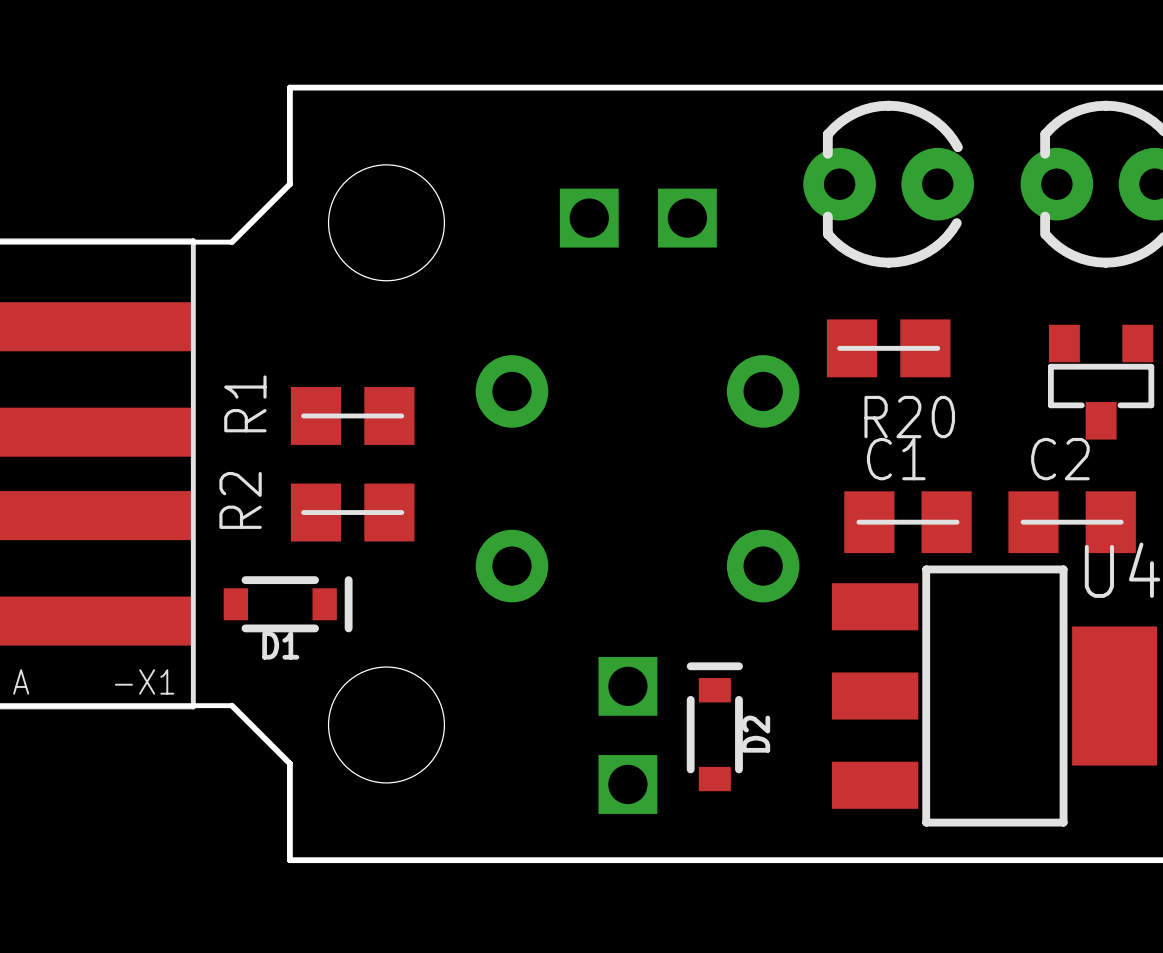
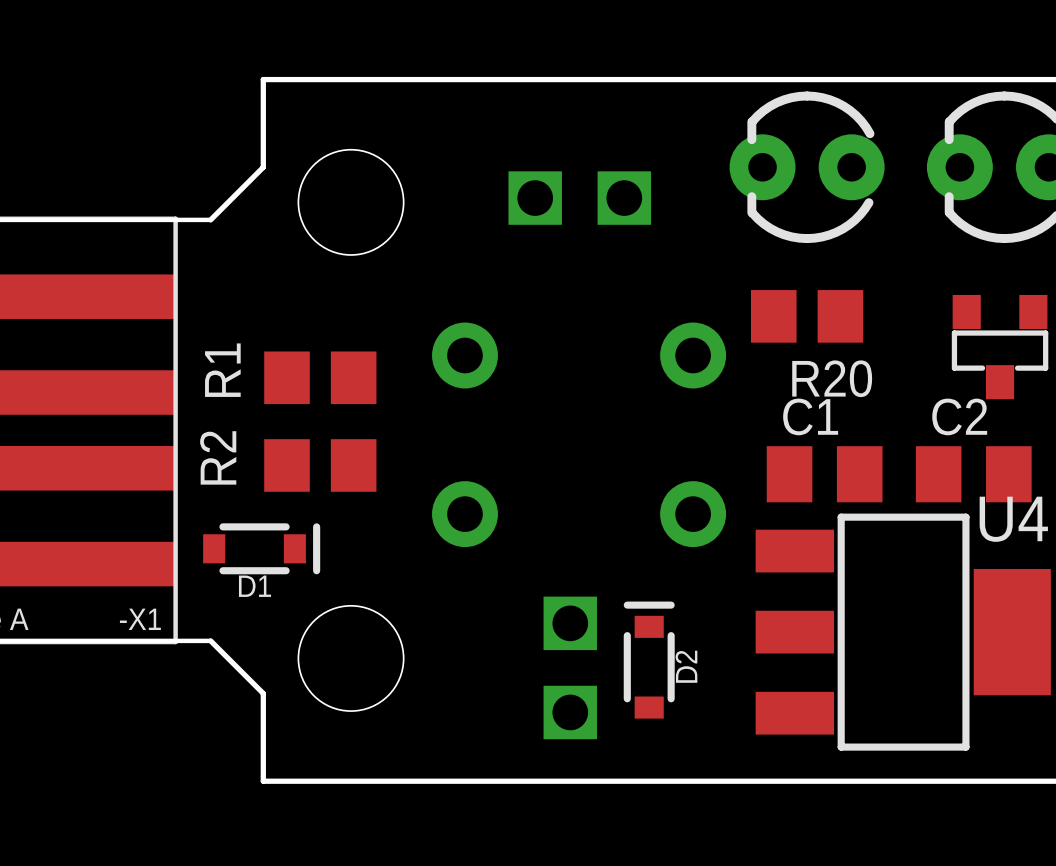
R20 footprint: [826, 319, 951, 378] -> [750, 290, 864, 343]
R1 footprint: [290, 386, 415, 445] -> [264, 351, 377, 405]
R2 footprint: [290, 483, 415, 542] -> [264, 439, 377, 492]
C2 footprint: [844, 491, 972, 554] -> [766, 446, 883, 503]
C1 footprint: [1008, 491, 1136, 554] -> [915, 446, 1032, 503]

